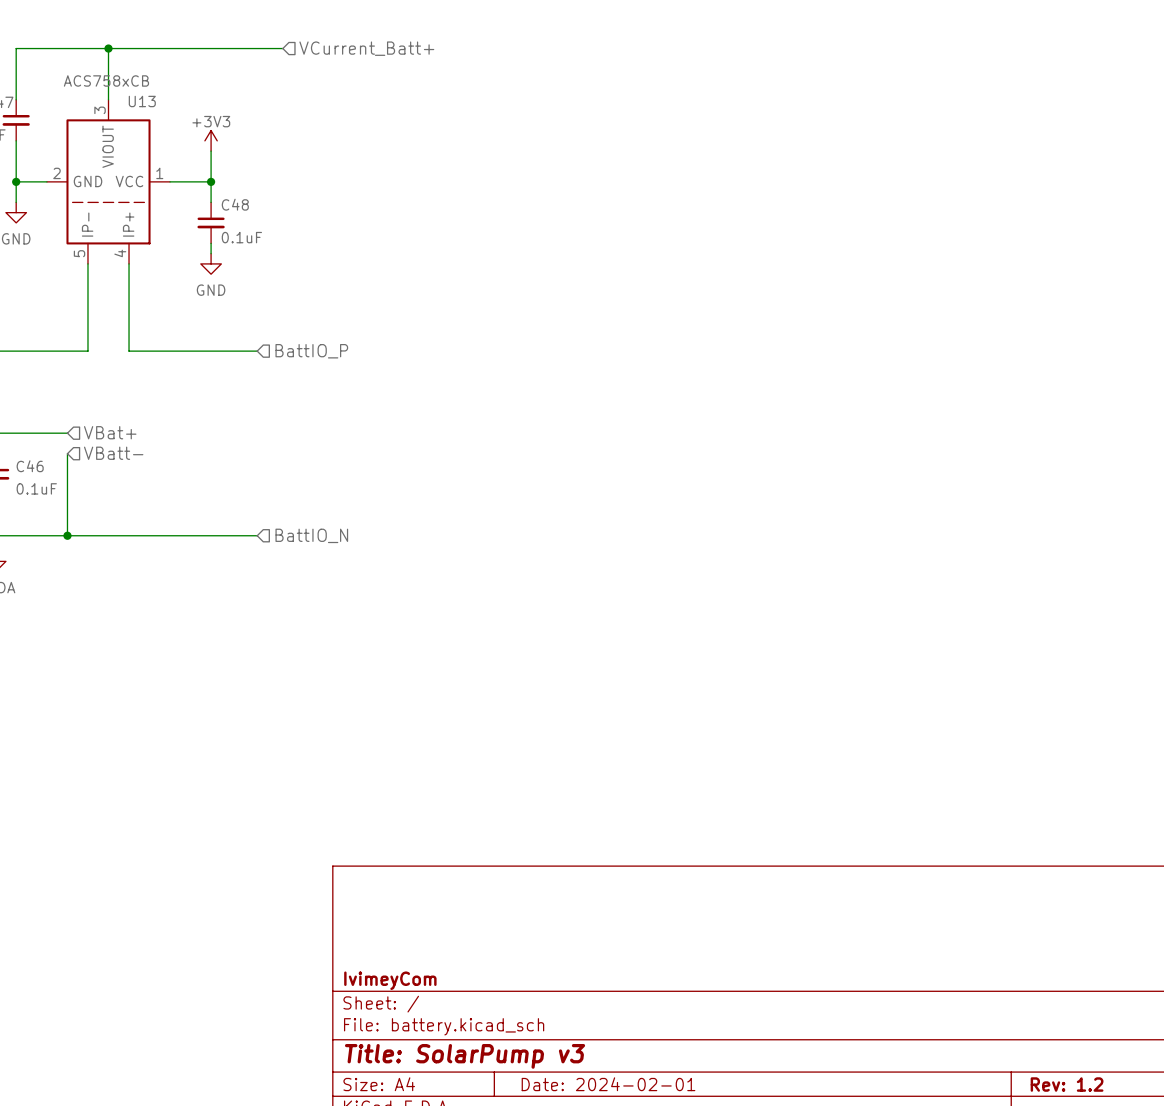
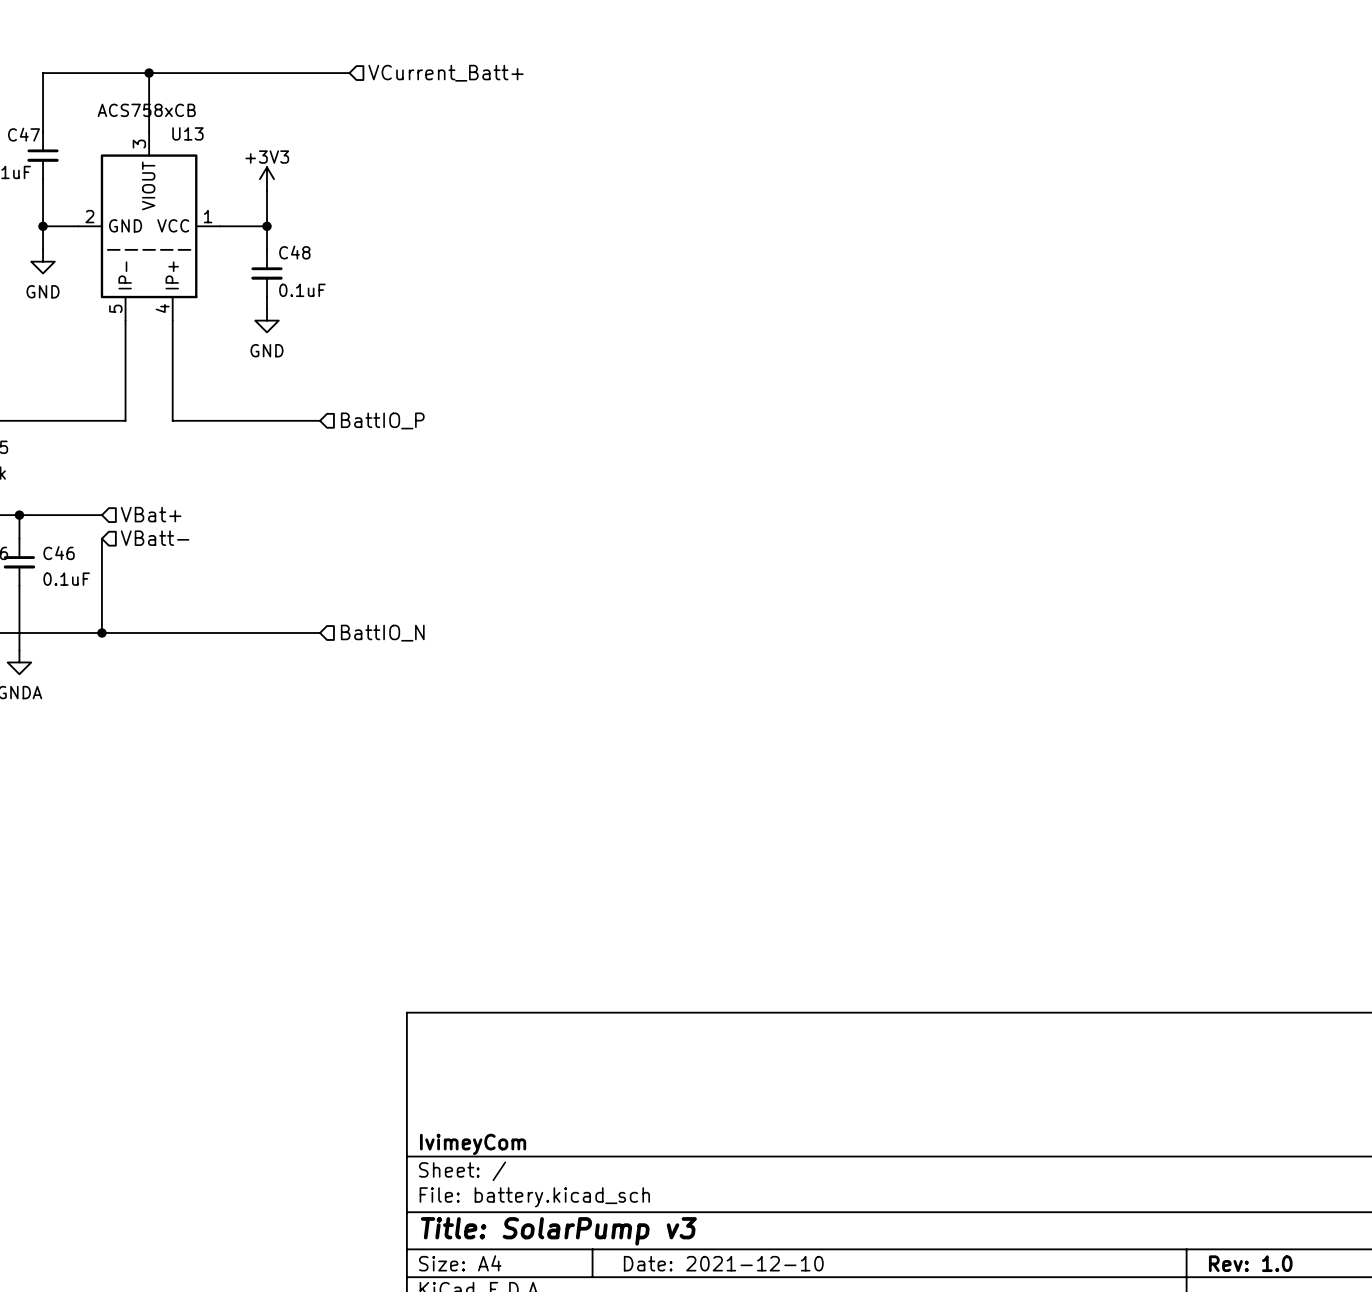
title block: Date: 2024-02-01 (608, 1084) -> Date: 2021-12-10 (723, 1263)
title block: Rev: 1.2 (1067, 1084) -> Rev: 1.0 (1250, 1263)

